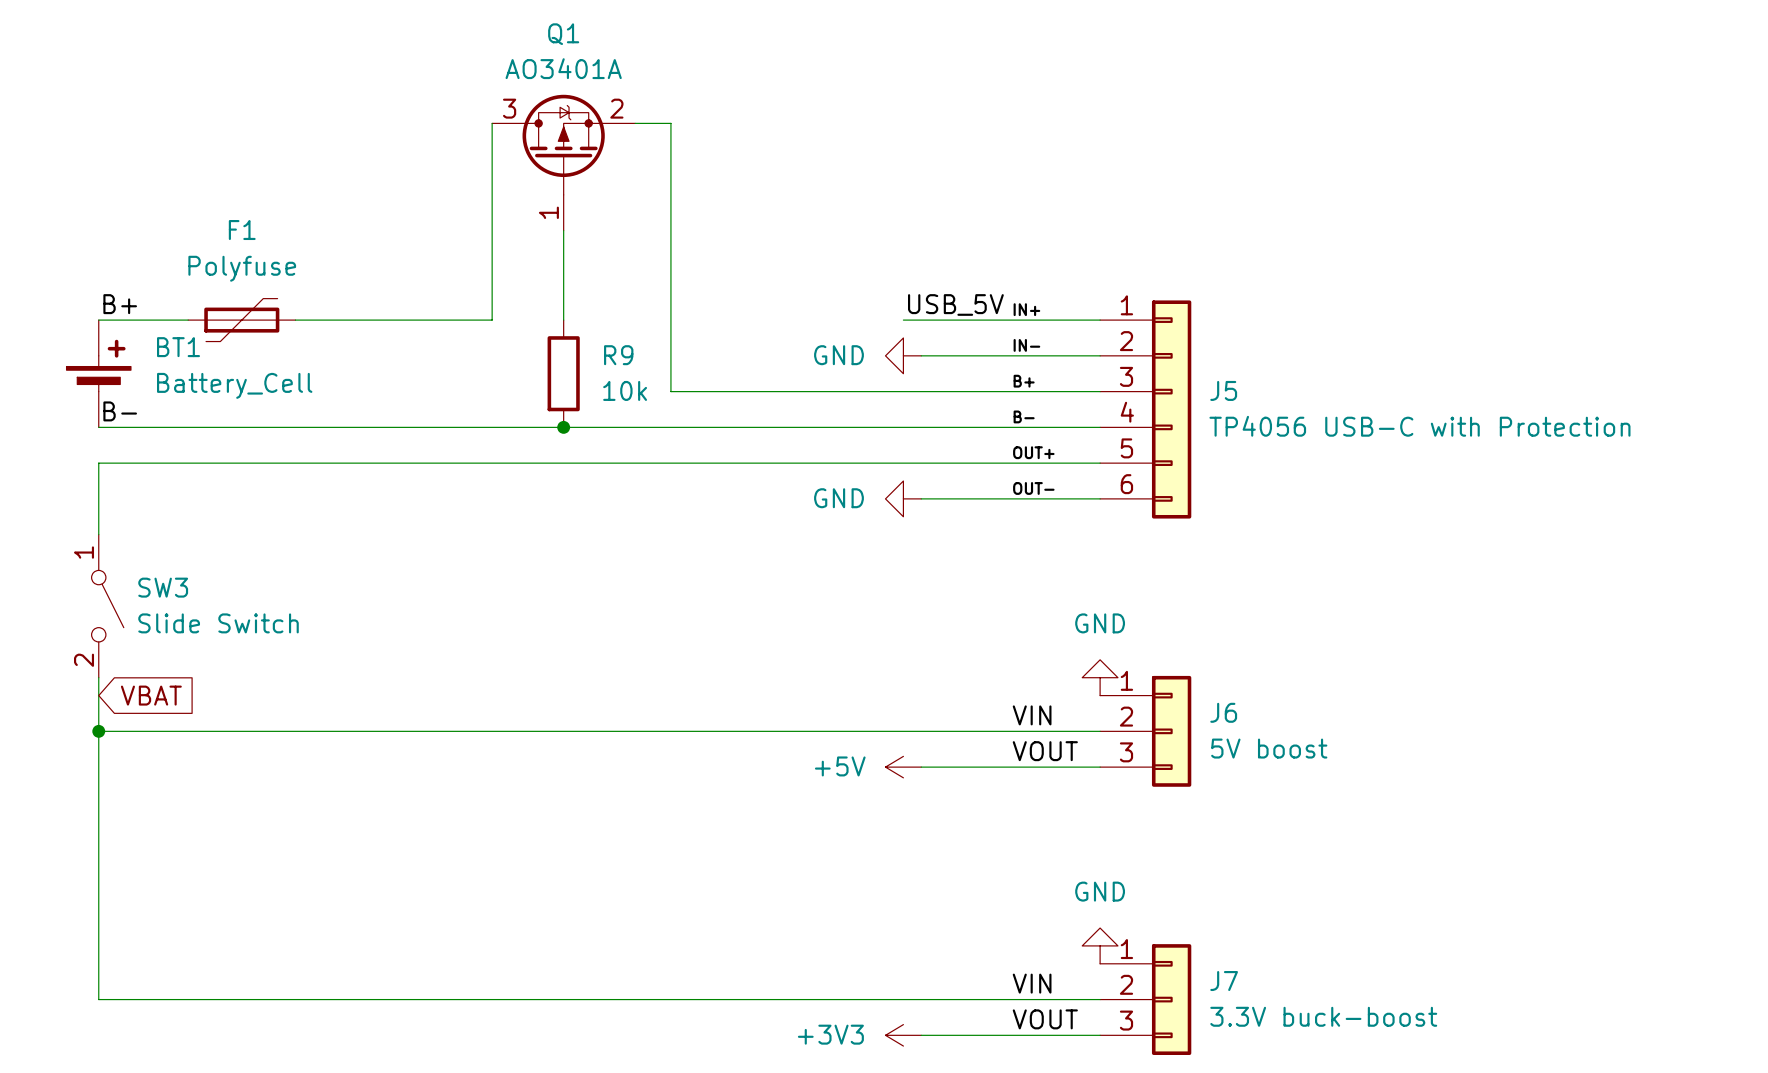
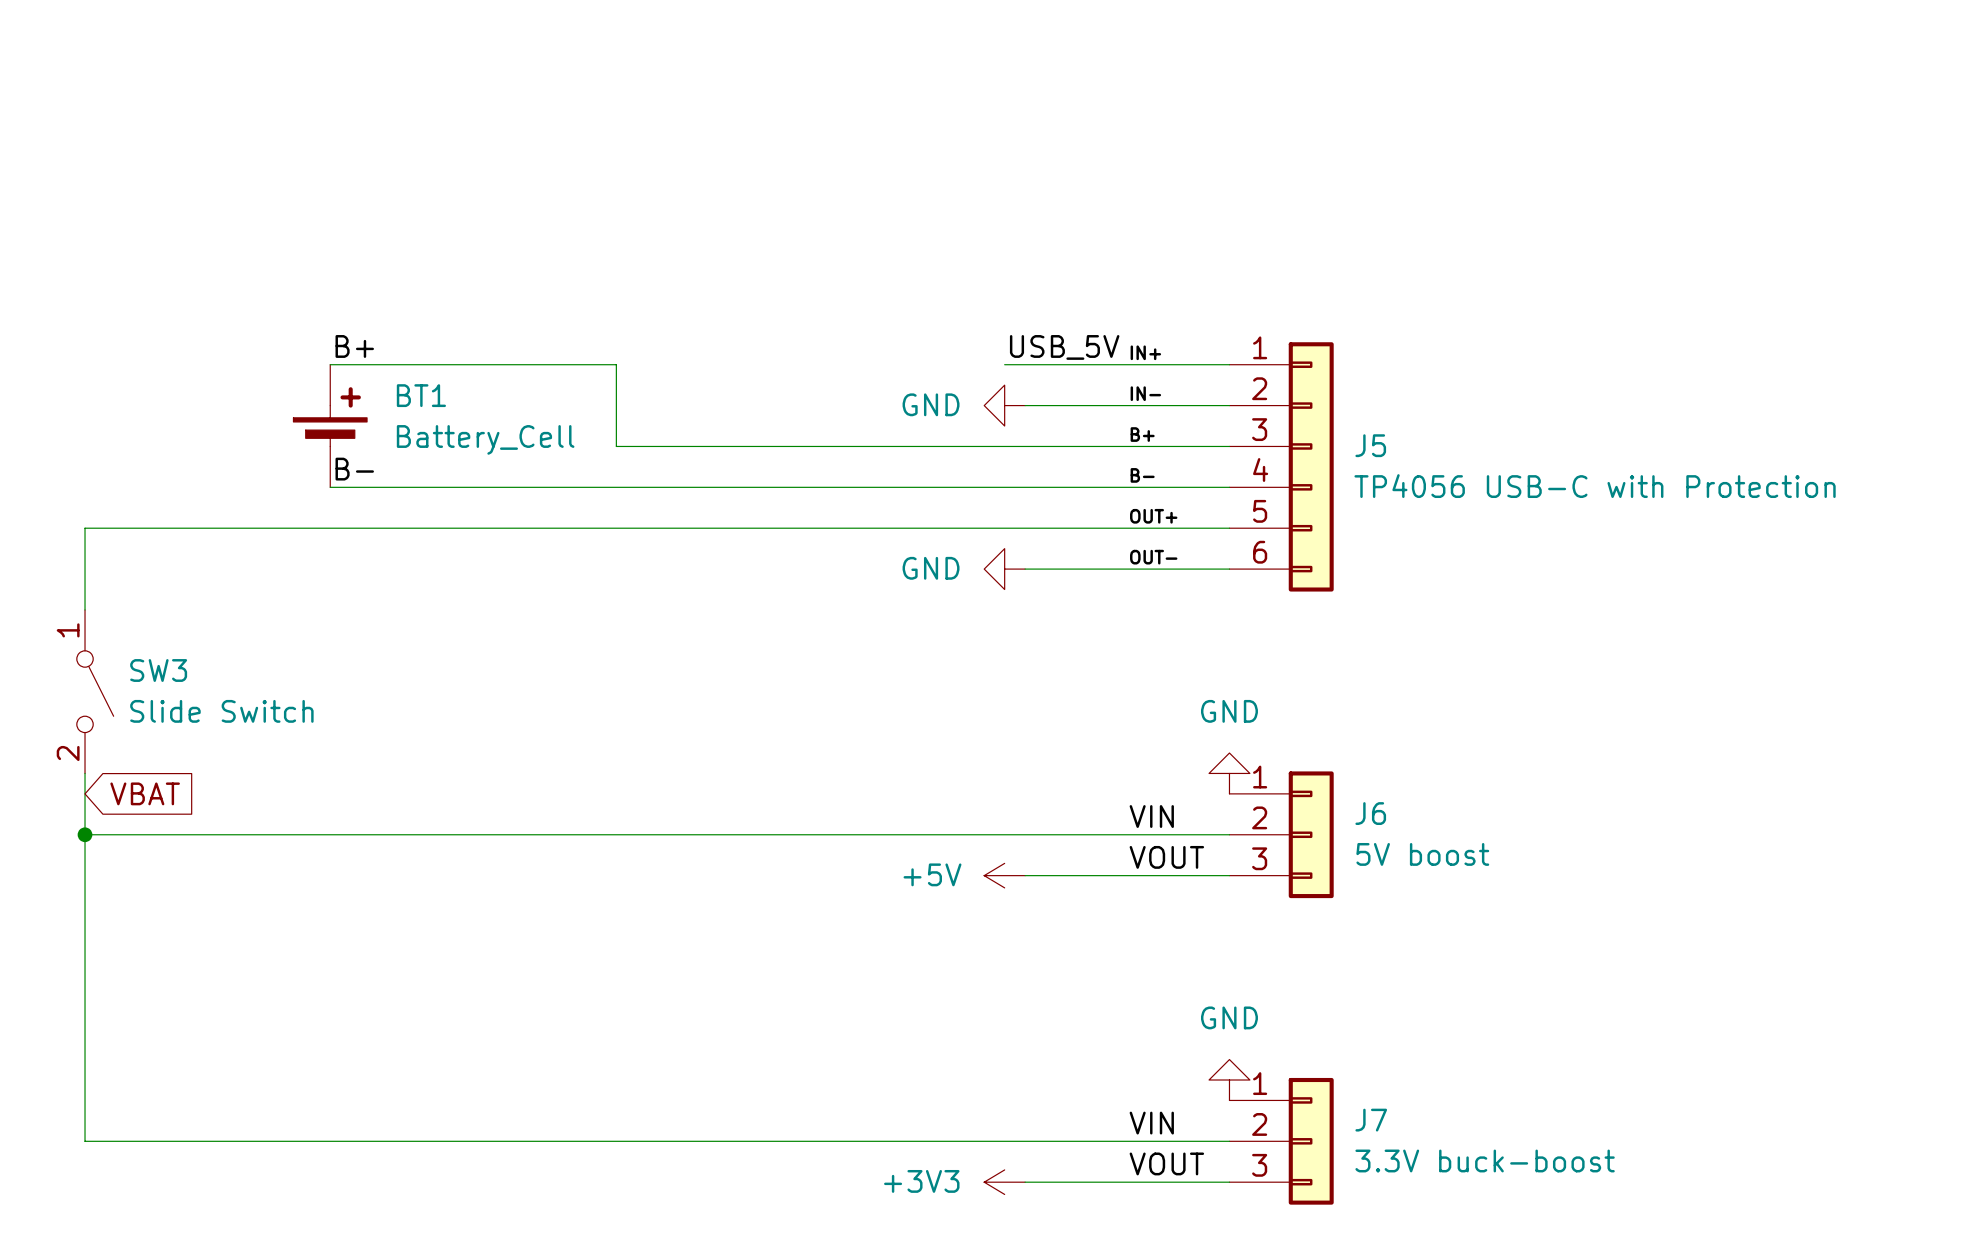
wire: (492, 123) (492, 320) -> none
wire: (635, 123) (670, 123) (670, 391) -> (534, 364) (616, 364) (616, 446) (738, 446)
Q1: AO3401A (563, 162) -> none
wire: (563, 230) (563, 320) -> none
label position: B+ (120, 304) -> B+ (354, 346)
wire: (98, 320) (188, 320) -> none
F1: Polyfuse (241, 320) -> none
wire: (295, 320) (313, 320) -> none
BT1 position: (98, 373) -> (330, 426)
R9: 10k (563, 373) -> none
label position: B- (120, 411) -> B- (354, 469)
wire: (98, 427) (313, 427) -> none
junction: (563, 427) -> none

